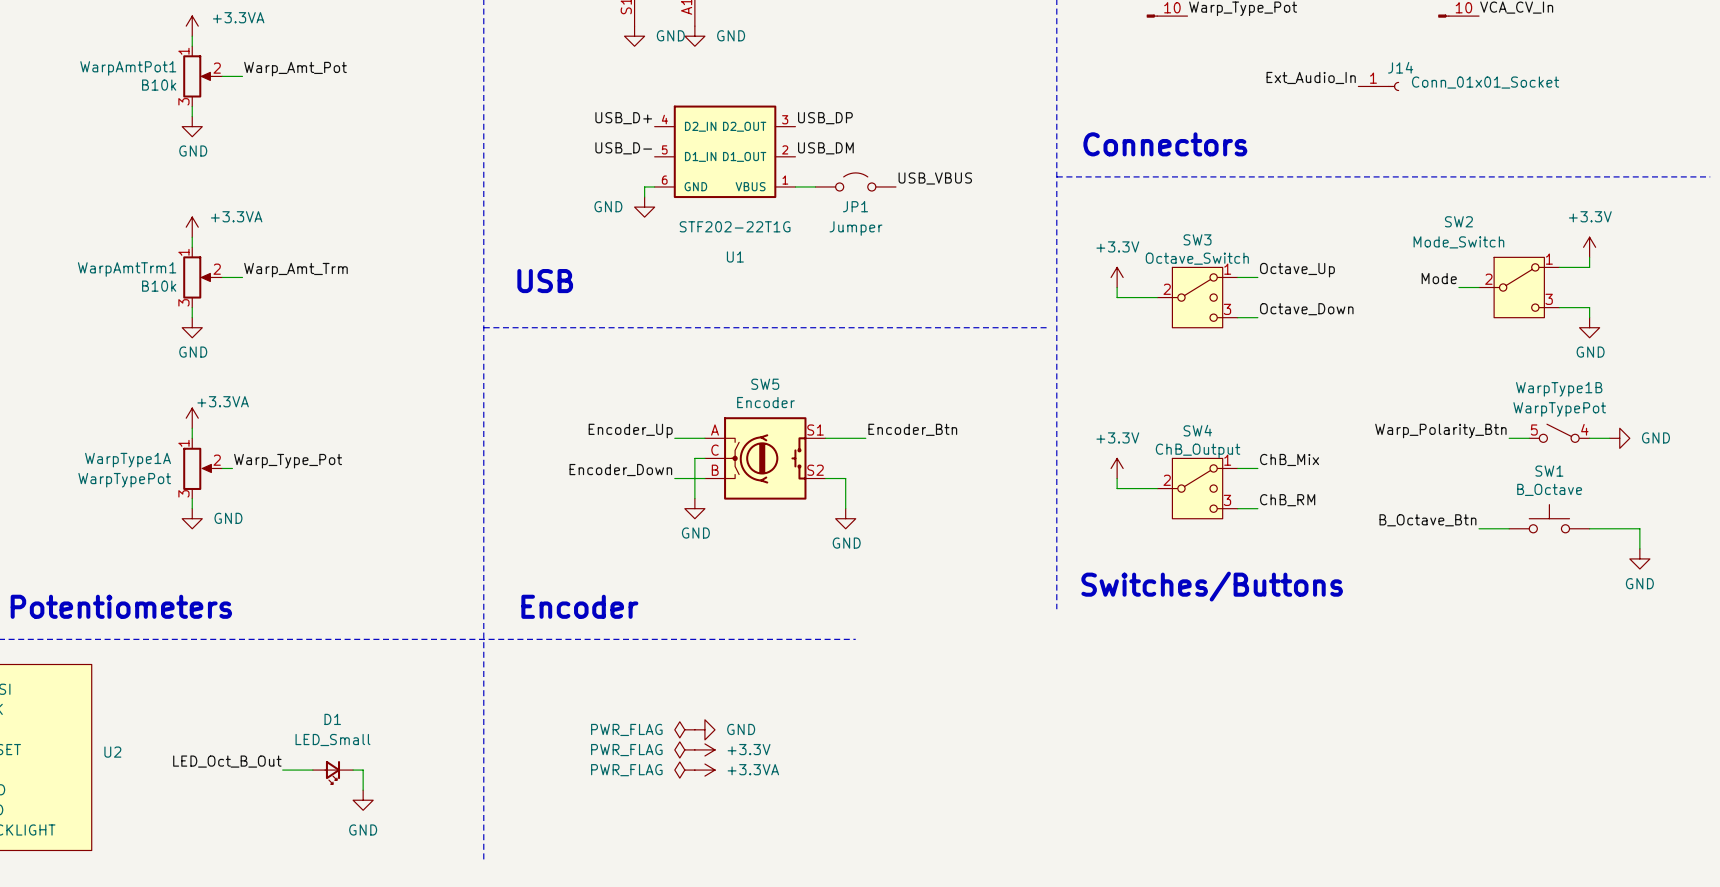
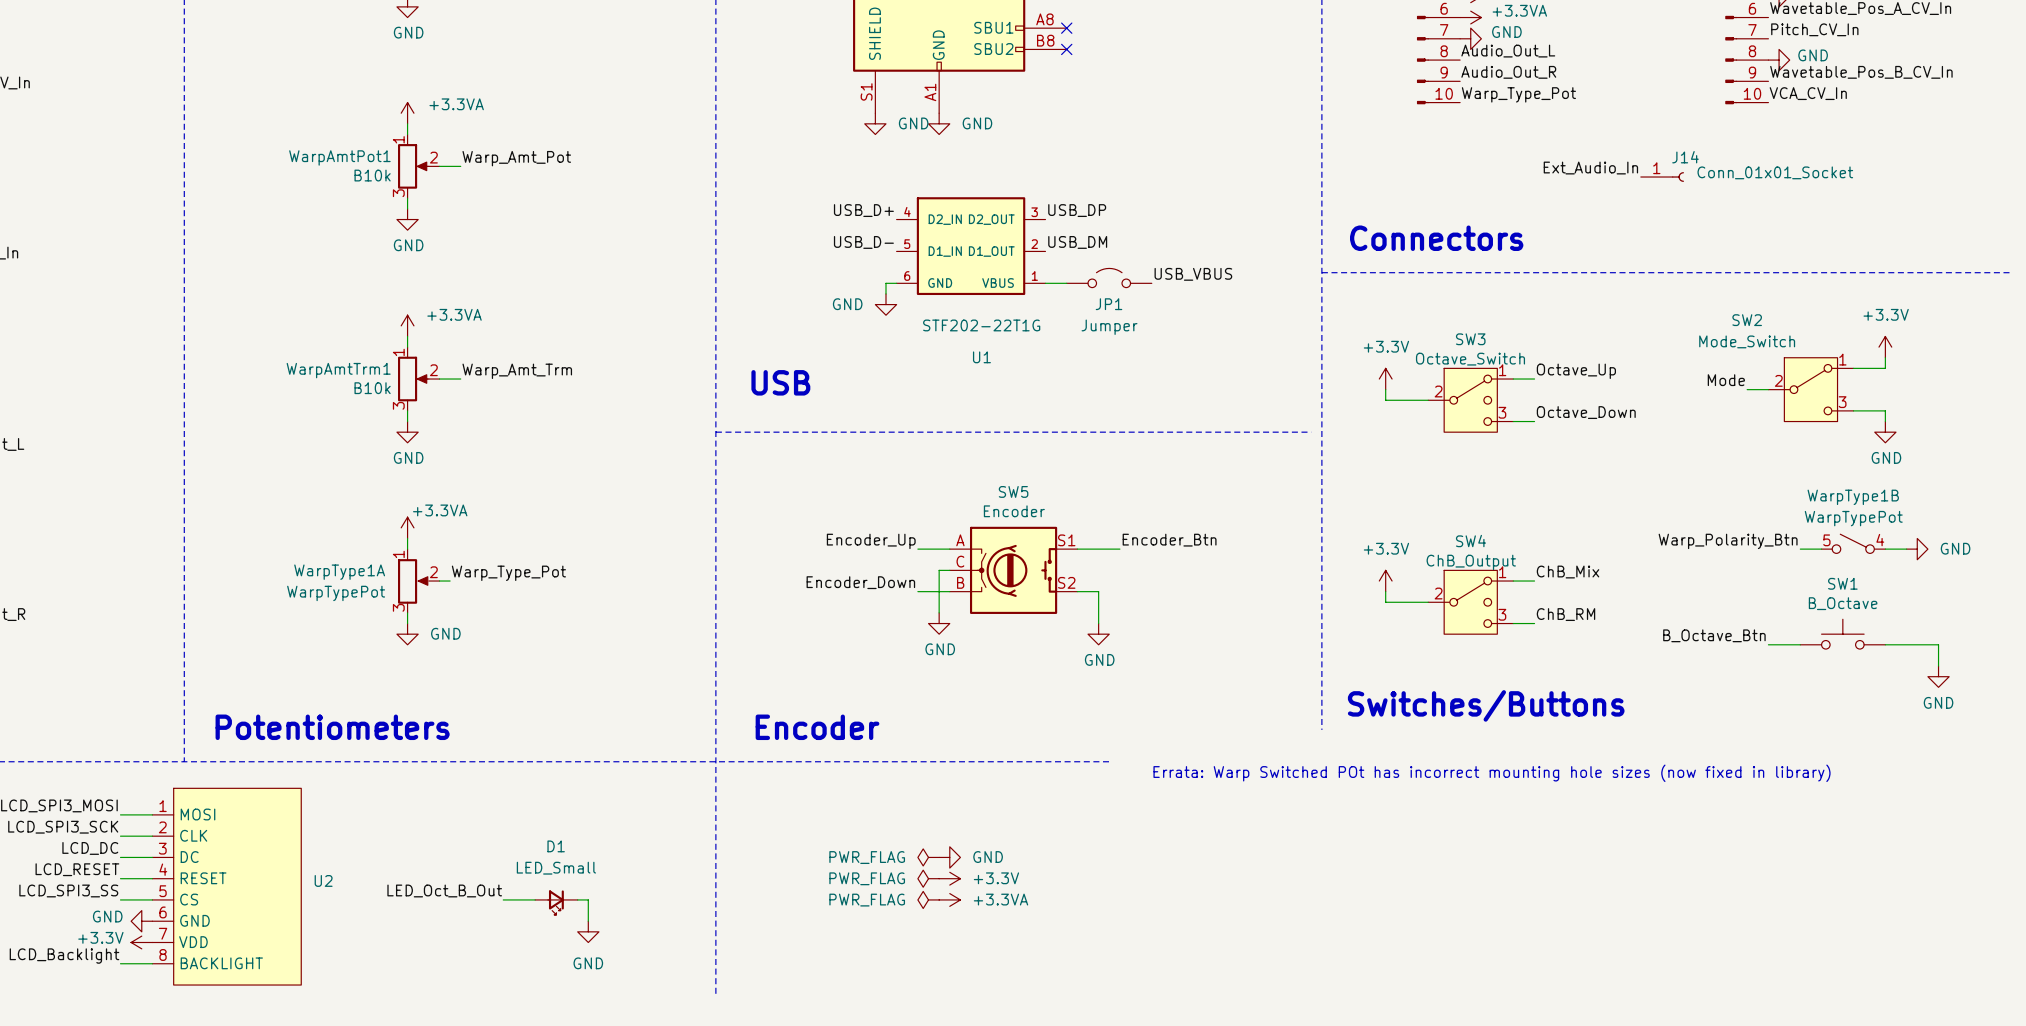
text: none -> Errata: Warp Switched POt has incorrect mounting hole sizes (now fixed in library) (1492, 773)

